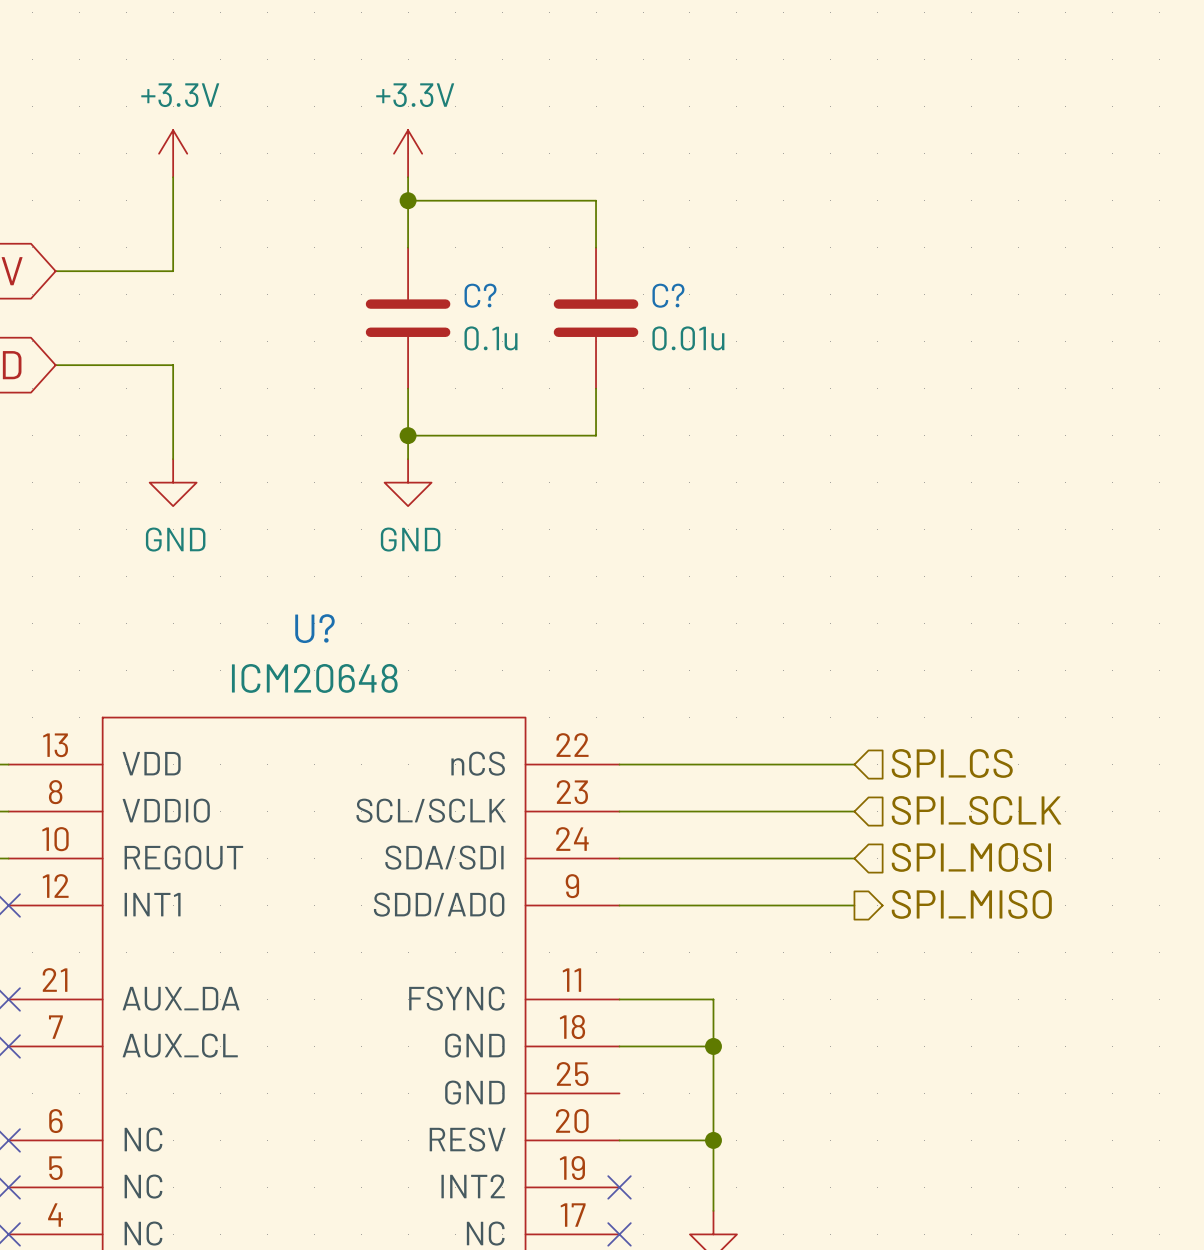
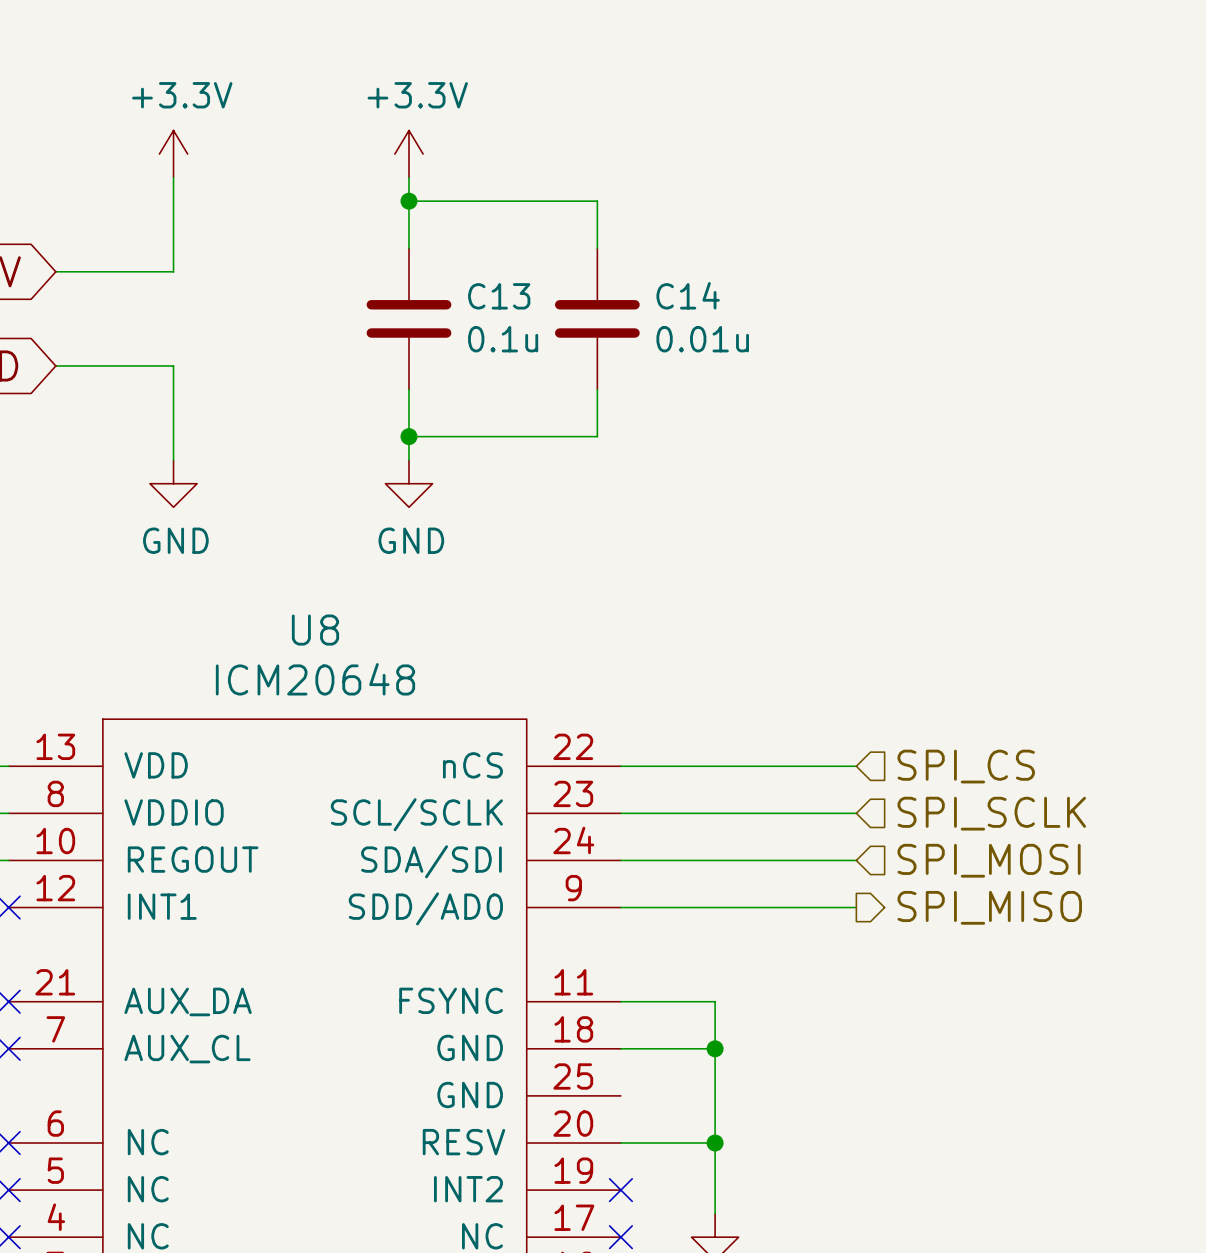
C? name: C? (480, 295) -> C13 (499, 296)
C? name: C? (668, 295) -> C14 (688, 295)
U? name: U? (314, 628) -> U8 (315, 630)

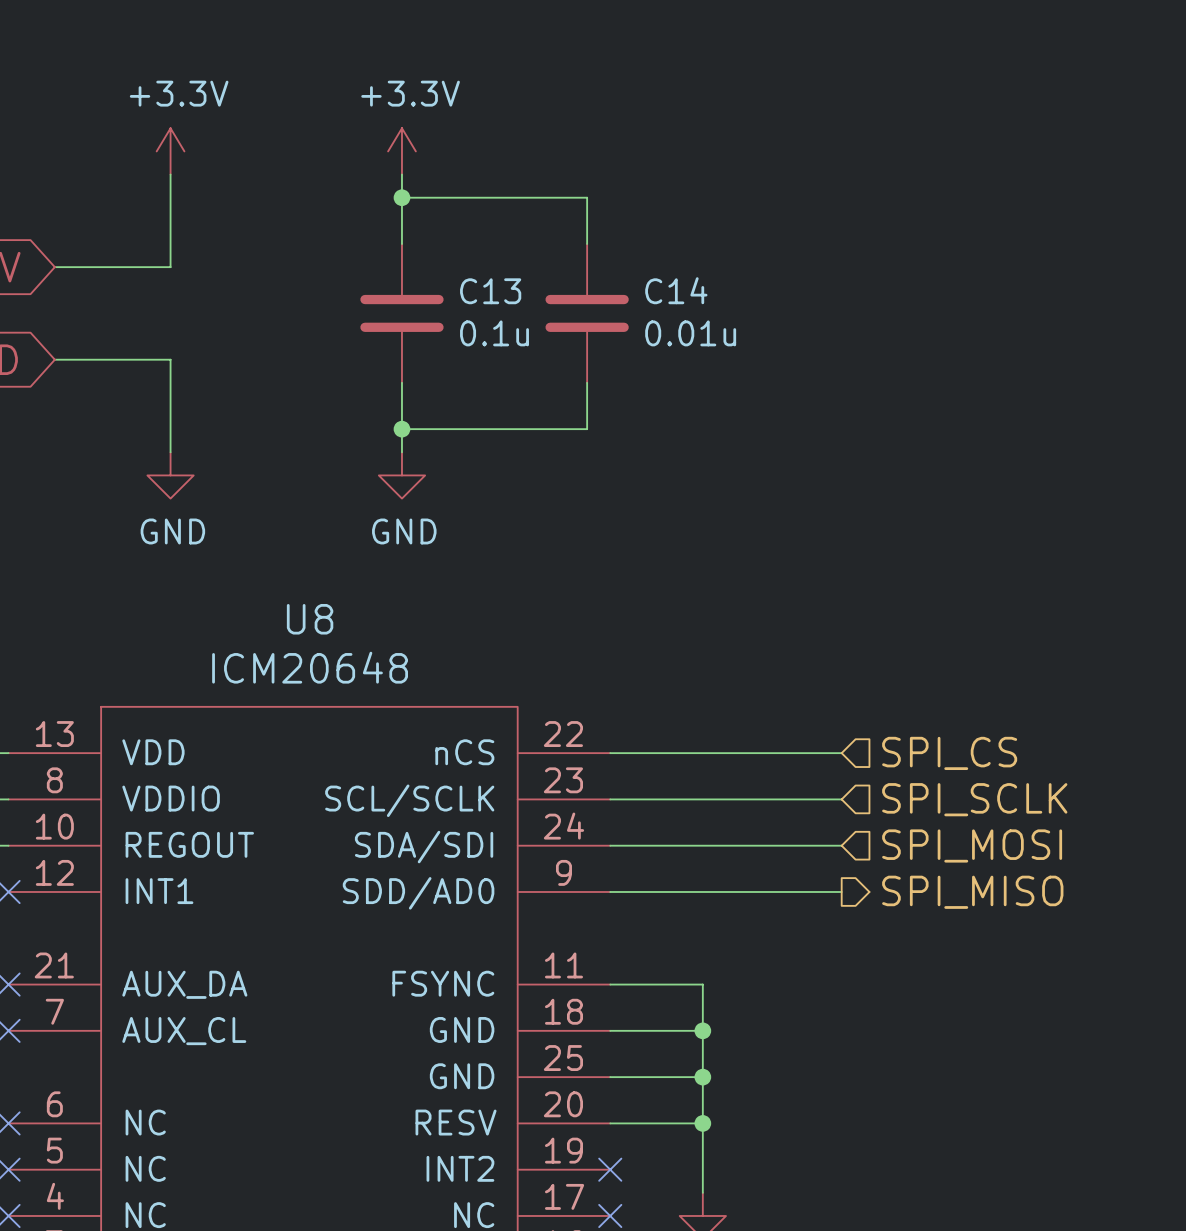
wire: none -> (610, 1077) (702, 1077)
junction: none -> (702, 1077)

